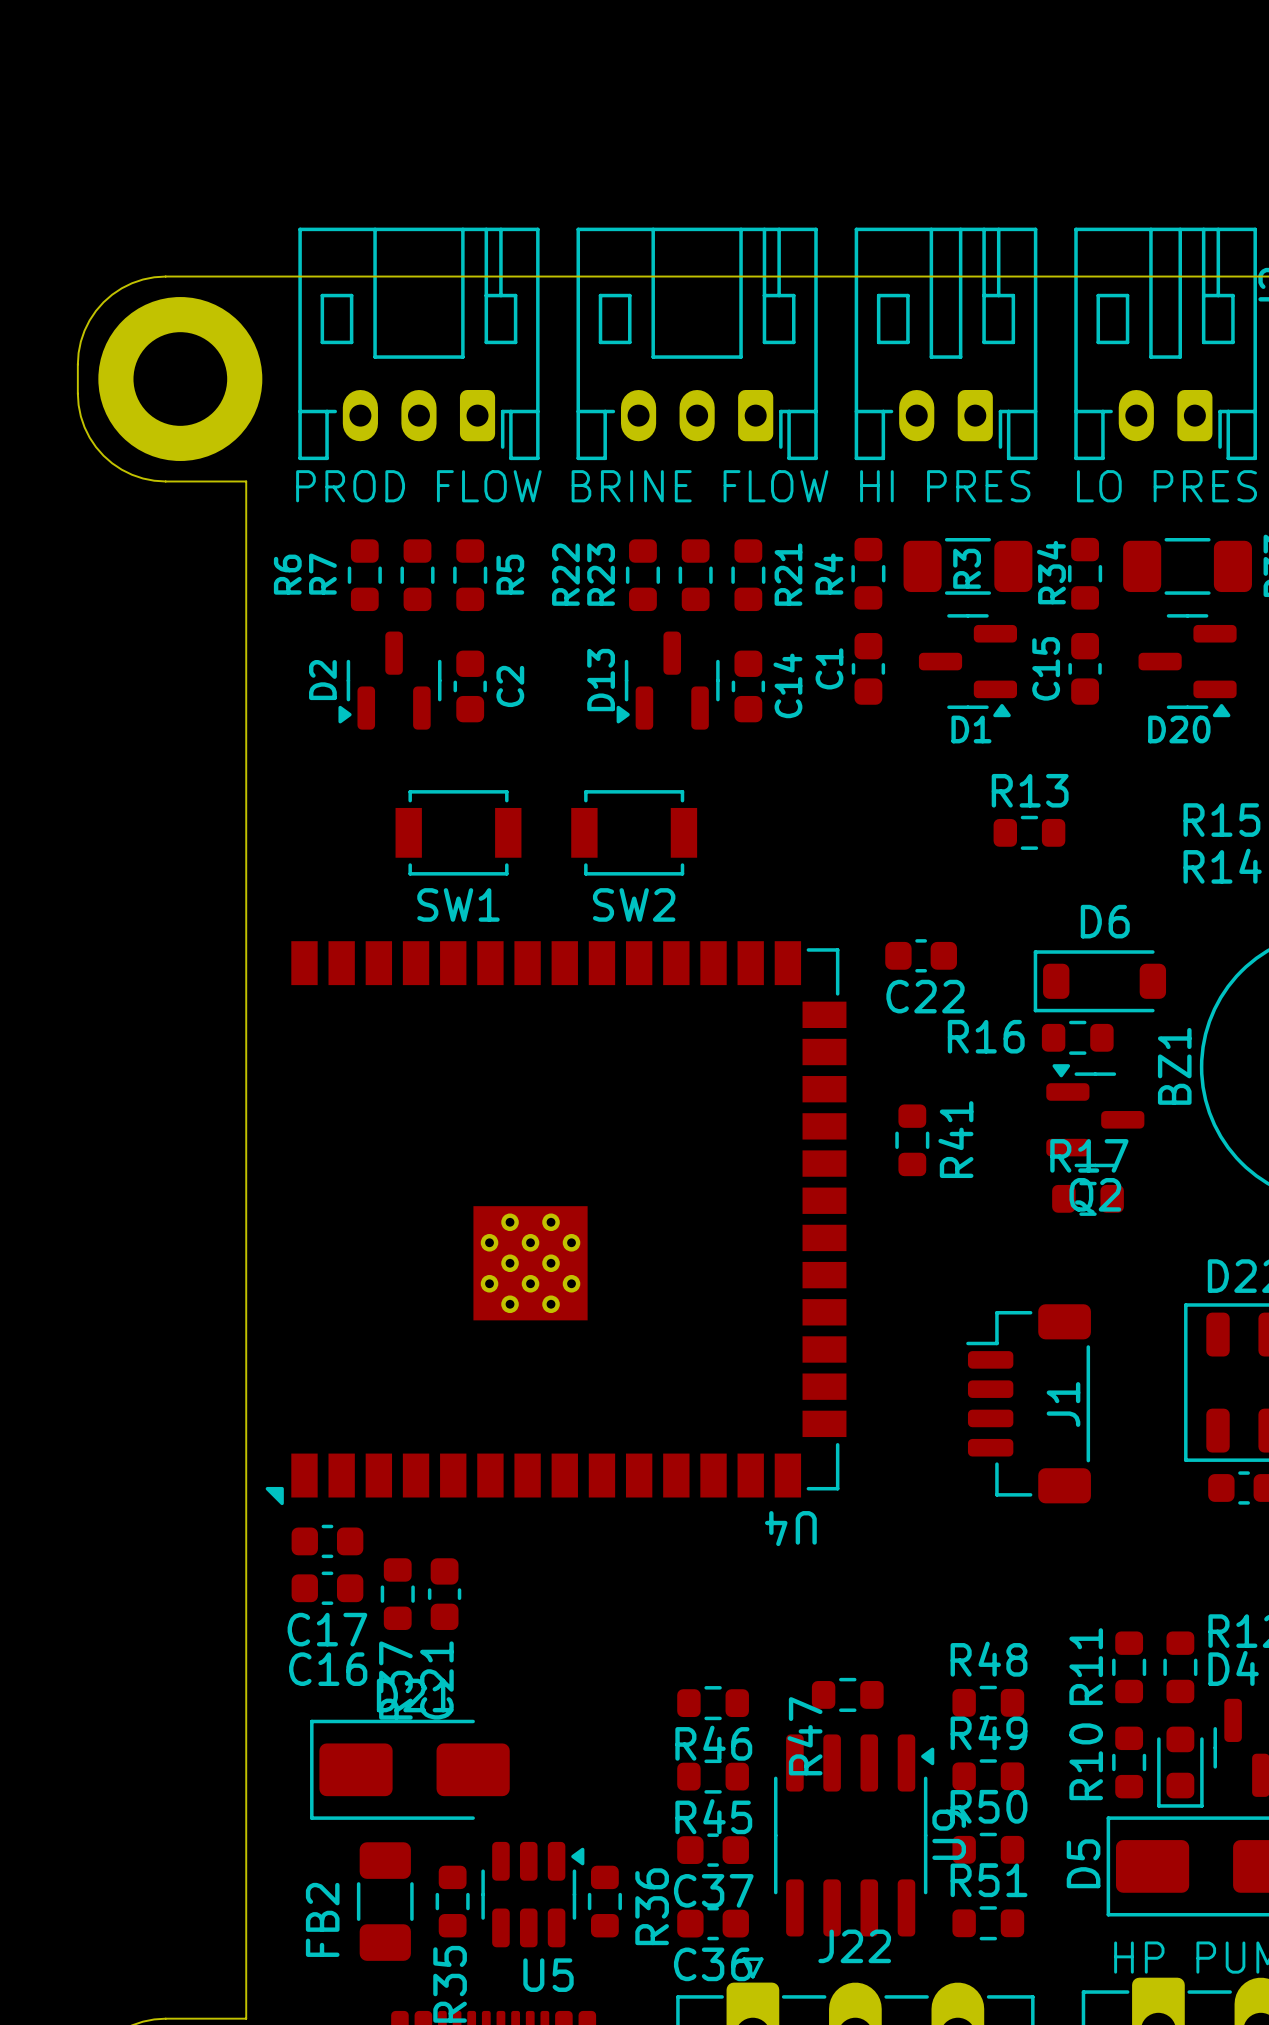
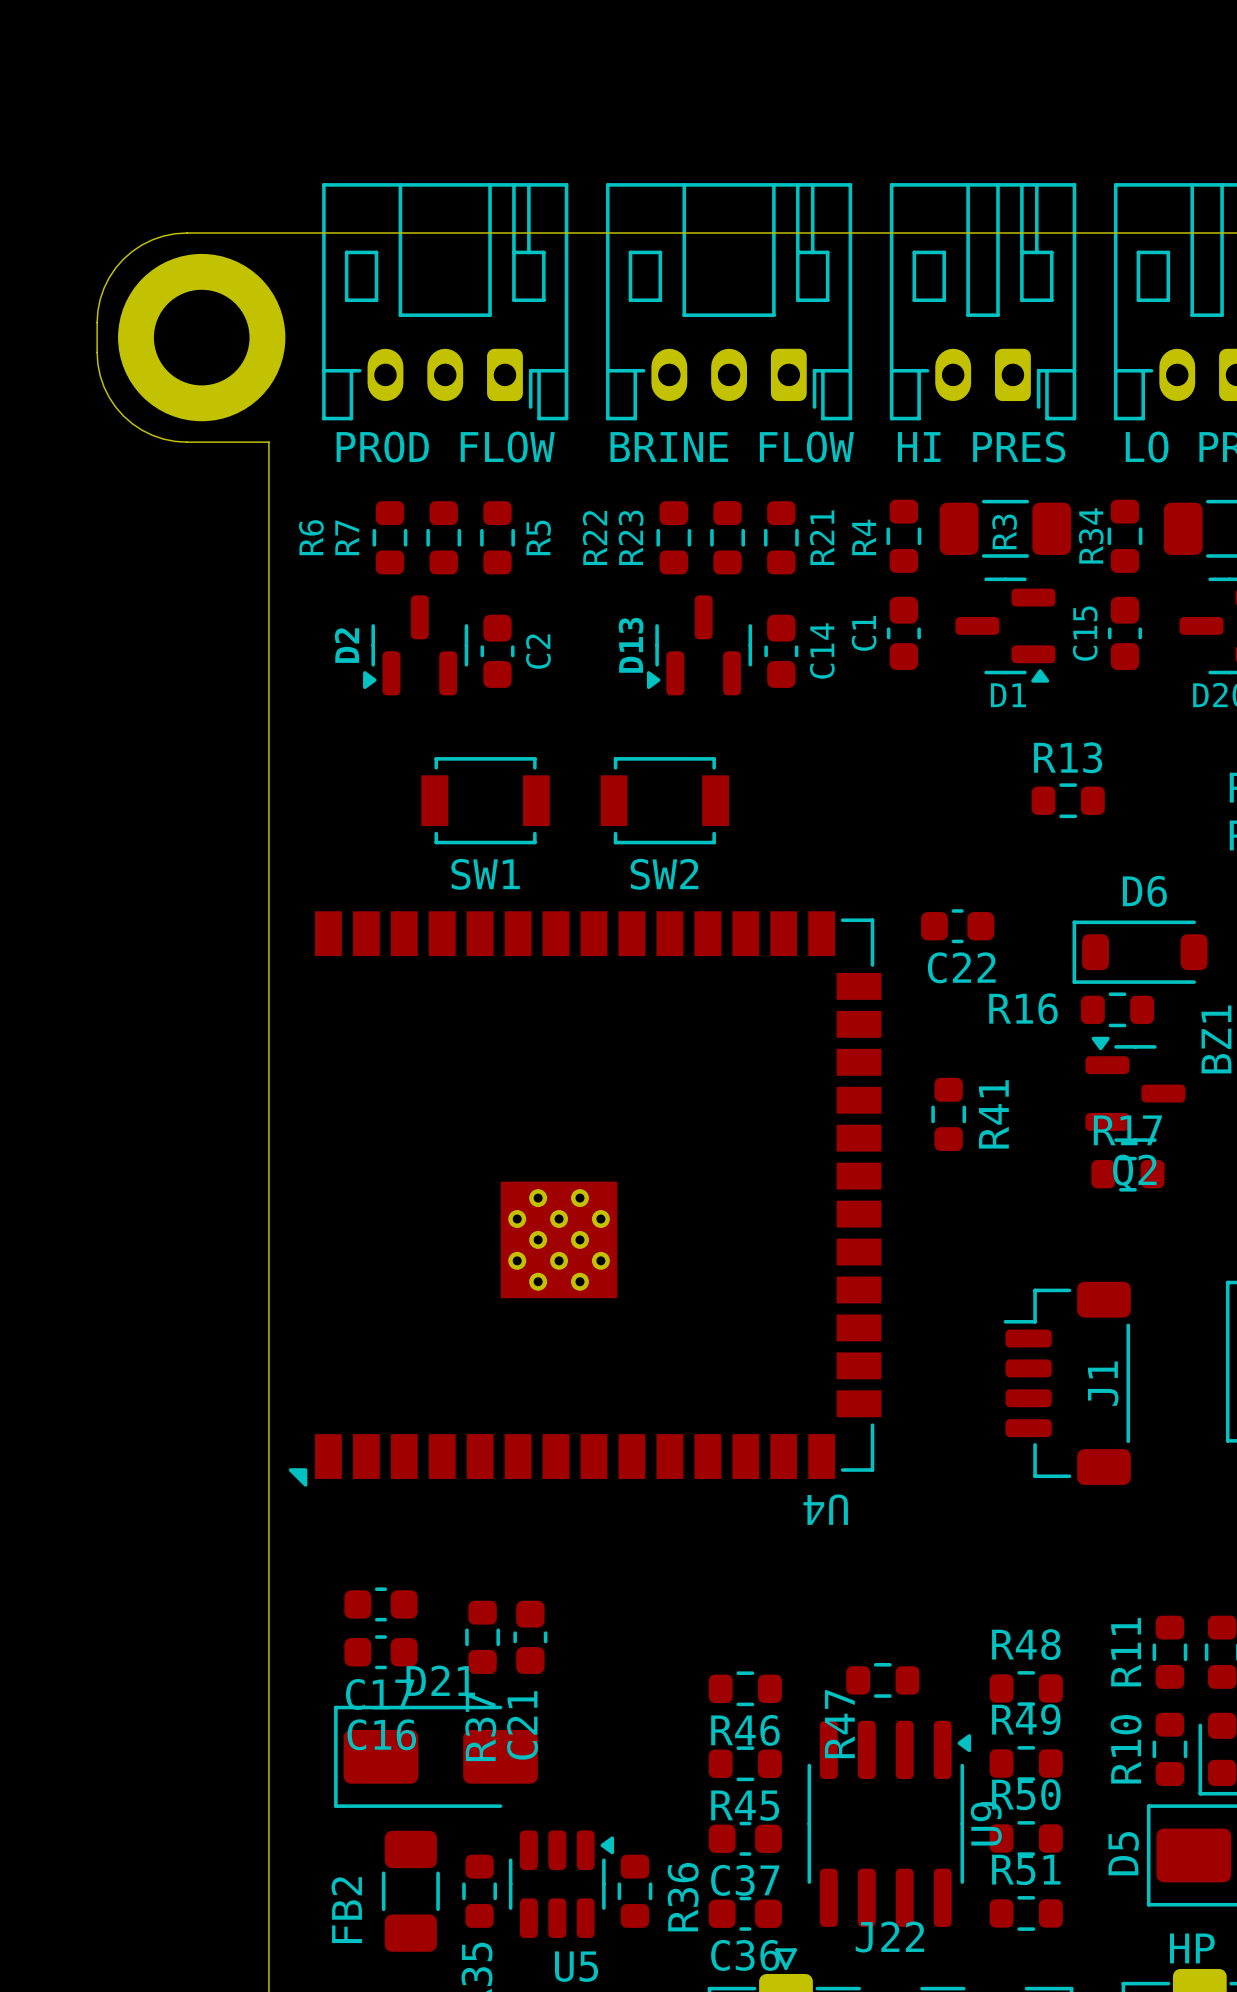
C17 position: (327, 1541) -> (380, 1604)
C16 position: (327, 1588) -> (380, 1652)
R37 position: (397, 1594) -> (482, 1637)
C21 position: (444, 1594) -> (530, 1637)

